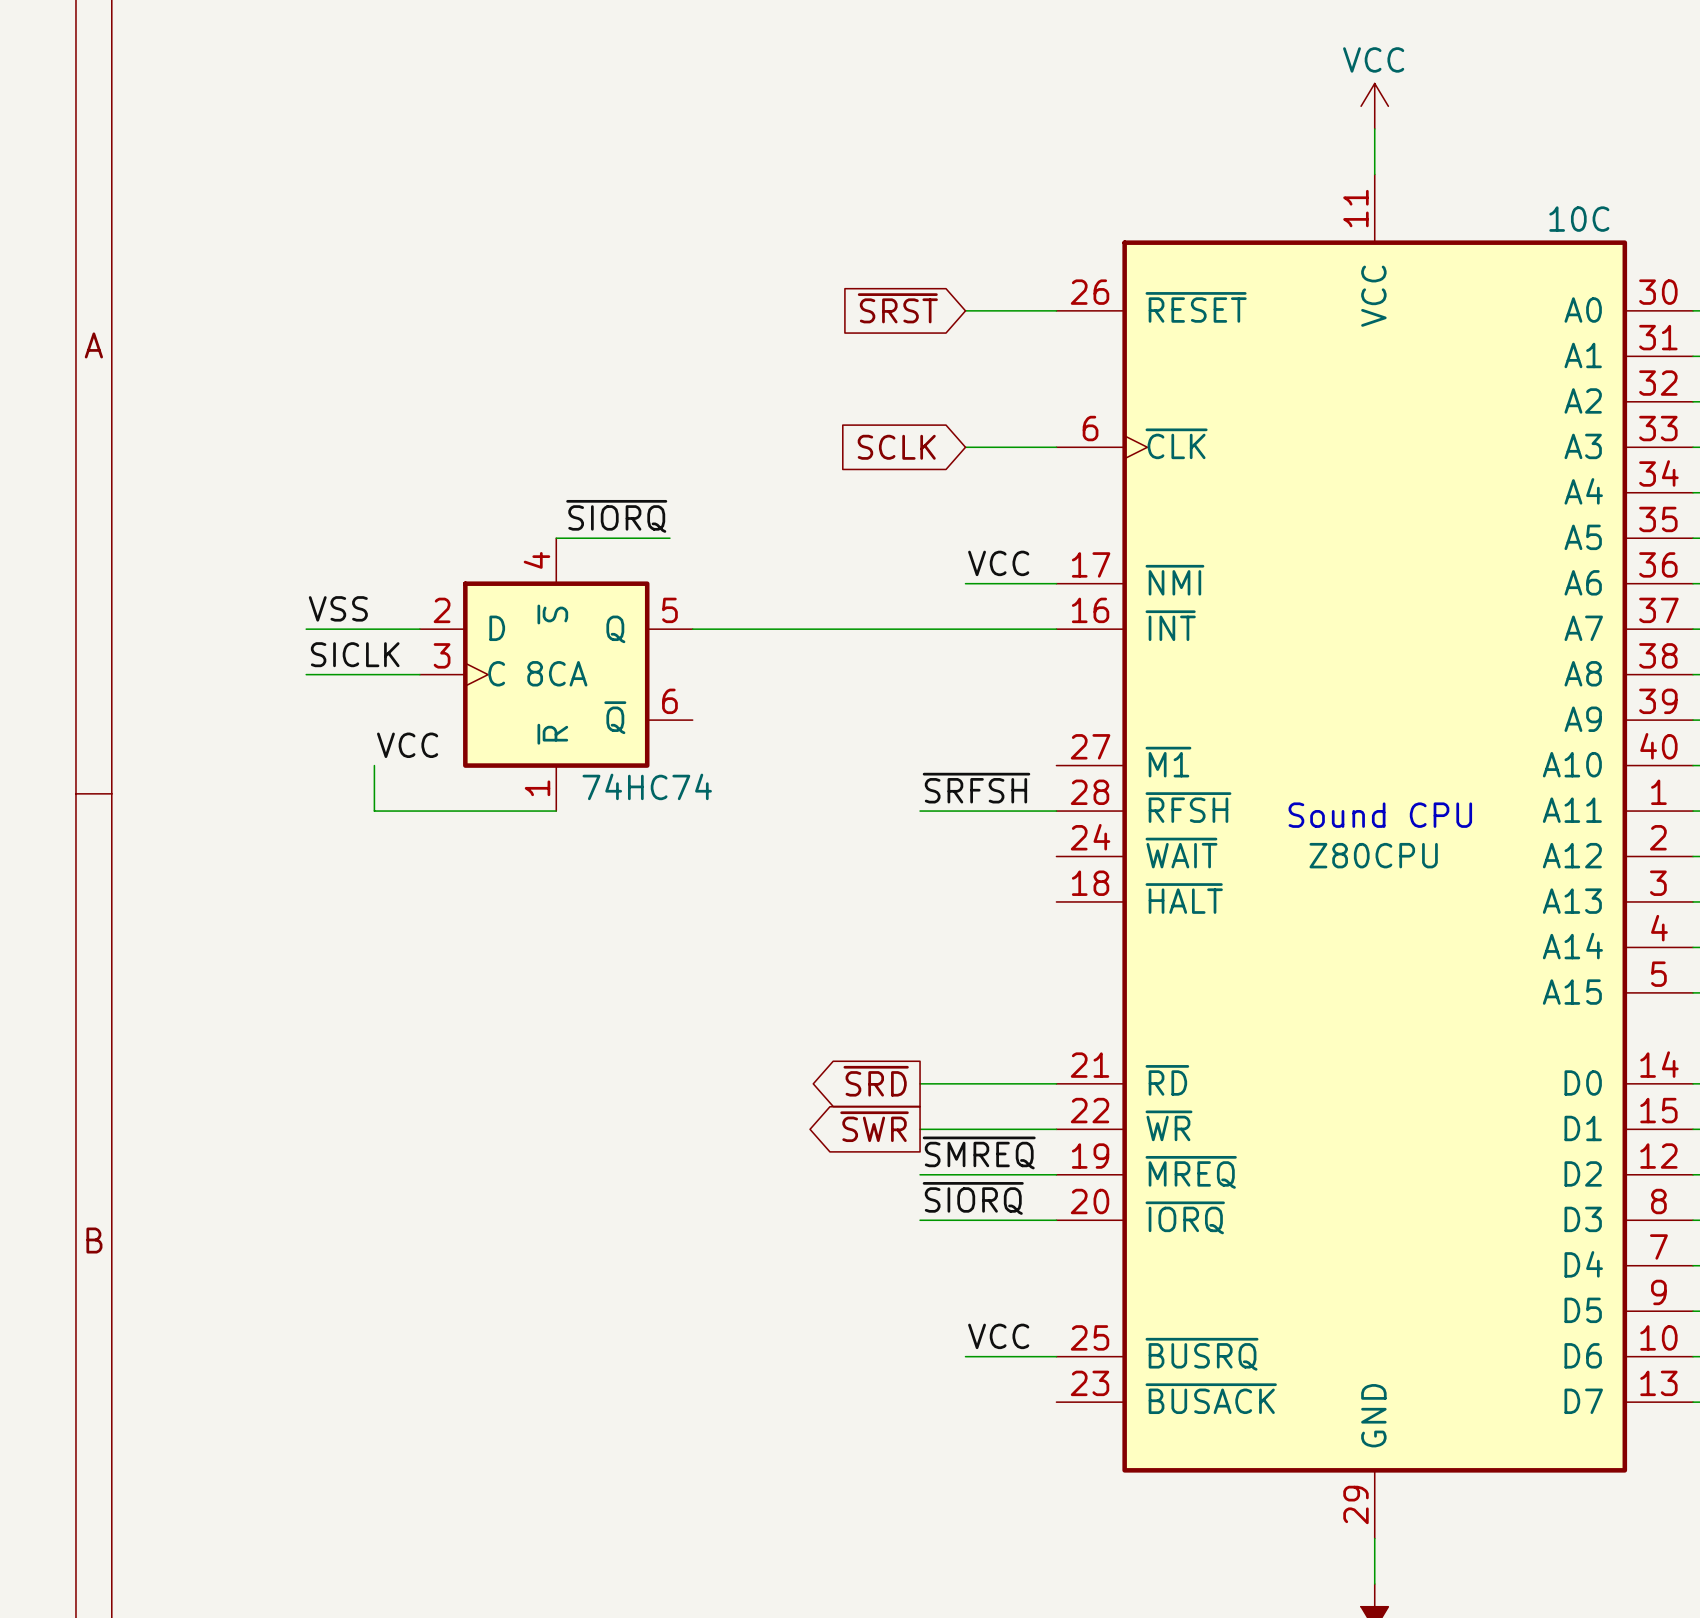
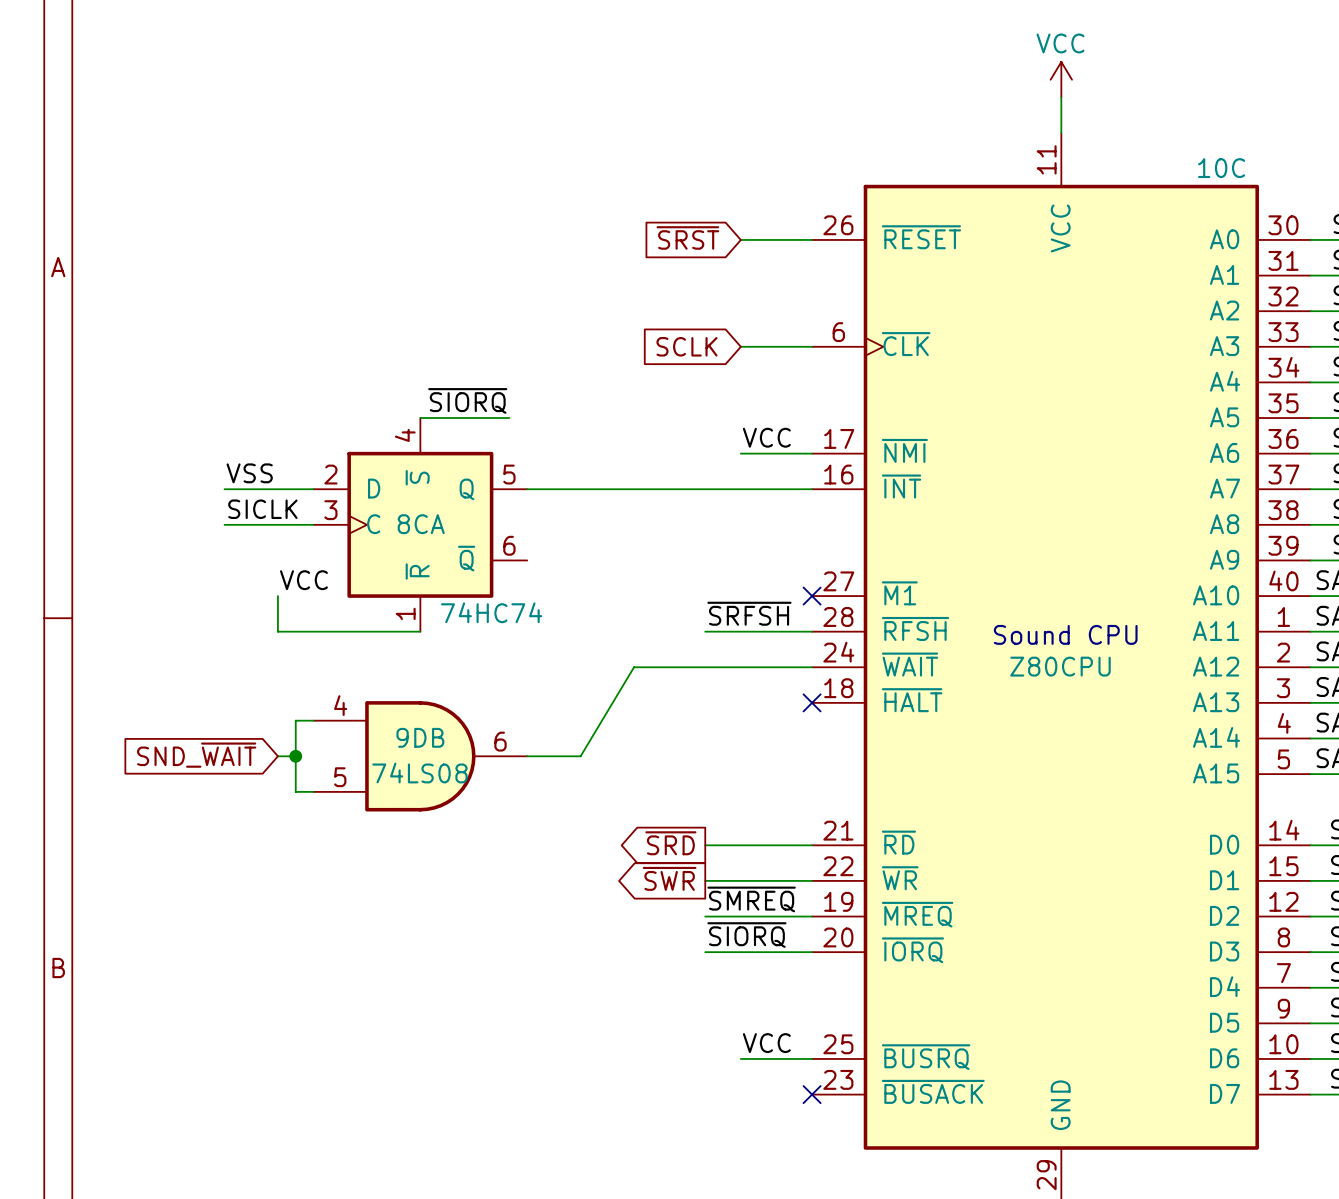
no-connect mark: none -> (812, 596)
wire: none -> (812, 667) (634, 667) (580, 756) (527, 756)
no-connect mark: none -> (812, 702)
wire: none -> (313, 720) (295, 720) (295, 791) (313, 791)
global label: none -> SND_~{WAIT} (196, 755)
wire: none -> (277, 756) (295, 756)
junction: none -> (295, 756)
9DB: none -> 74LS08 (420, 756)
no-connect mark: none -> (812, 1094)

